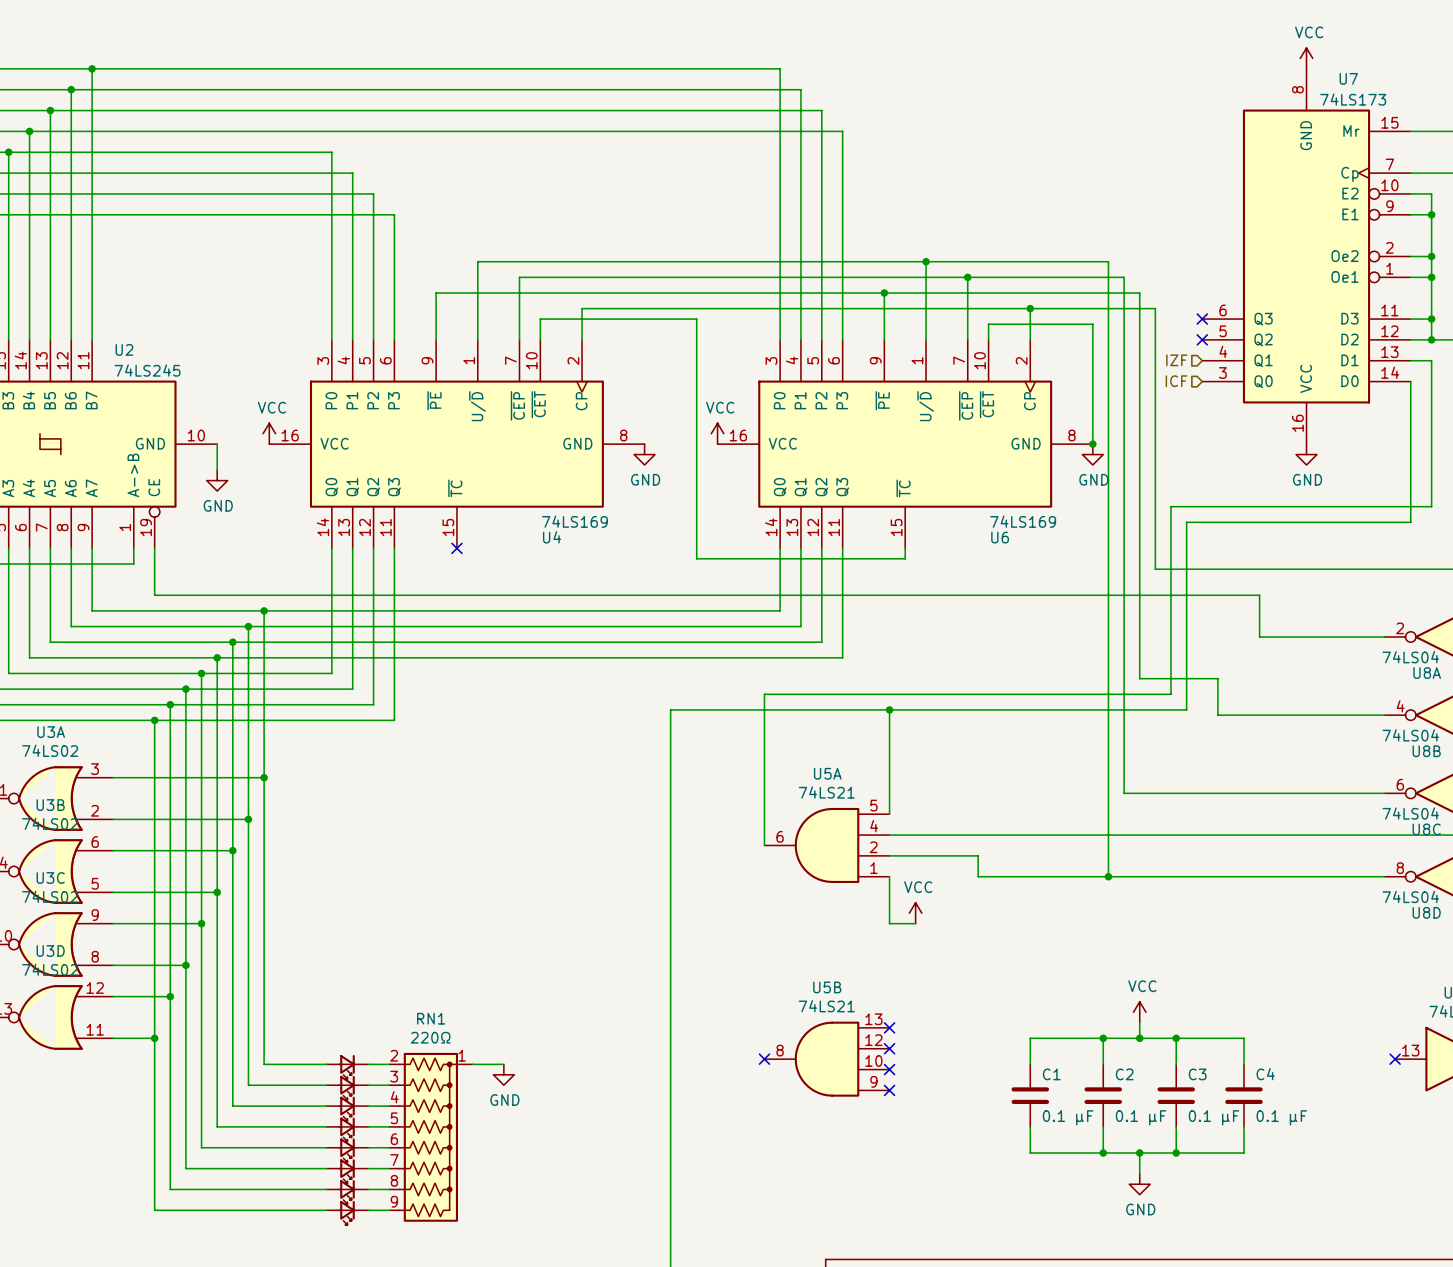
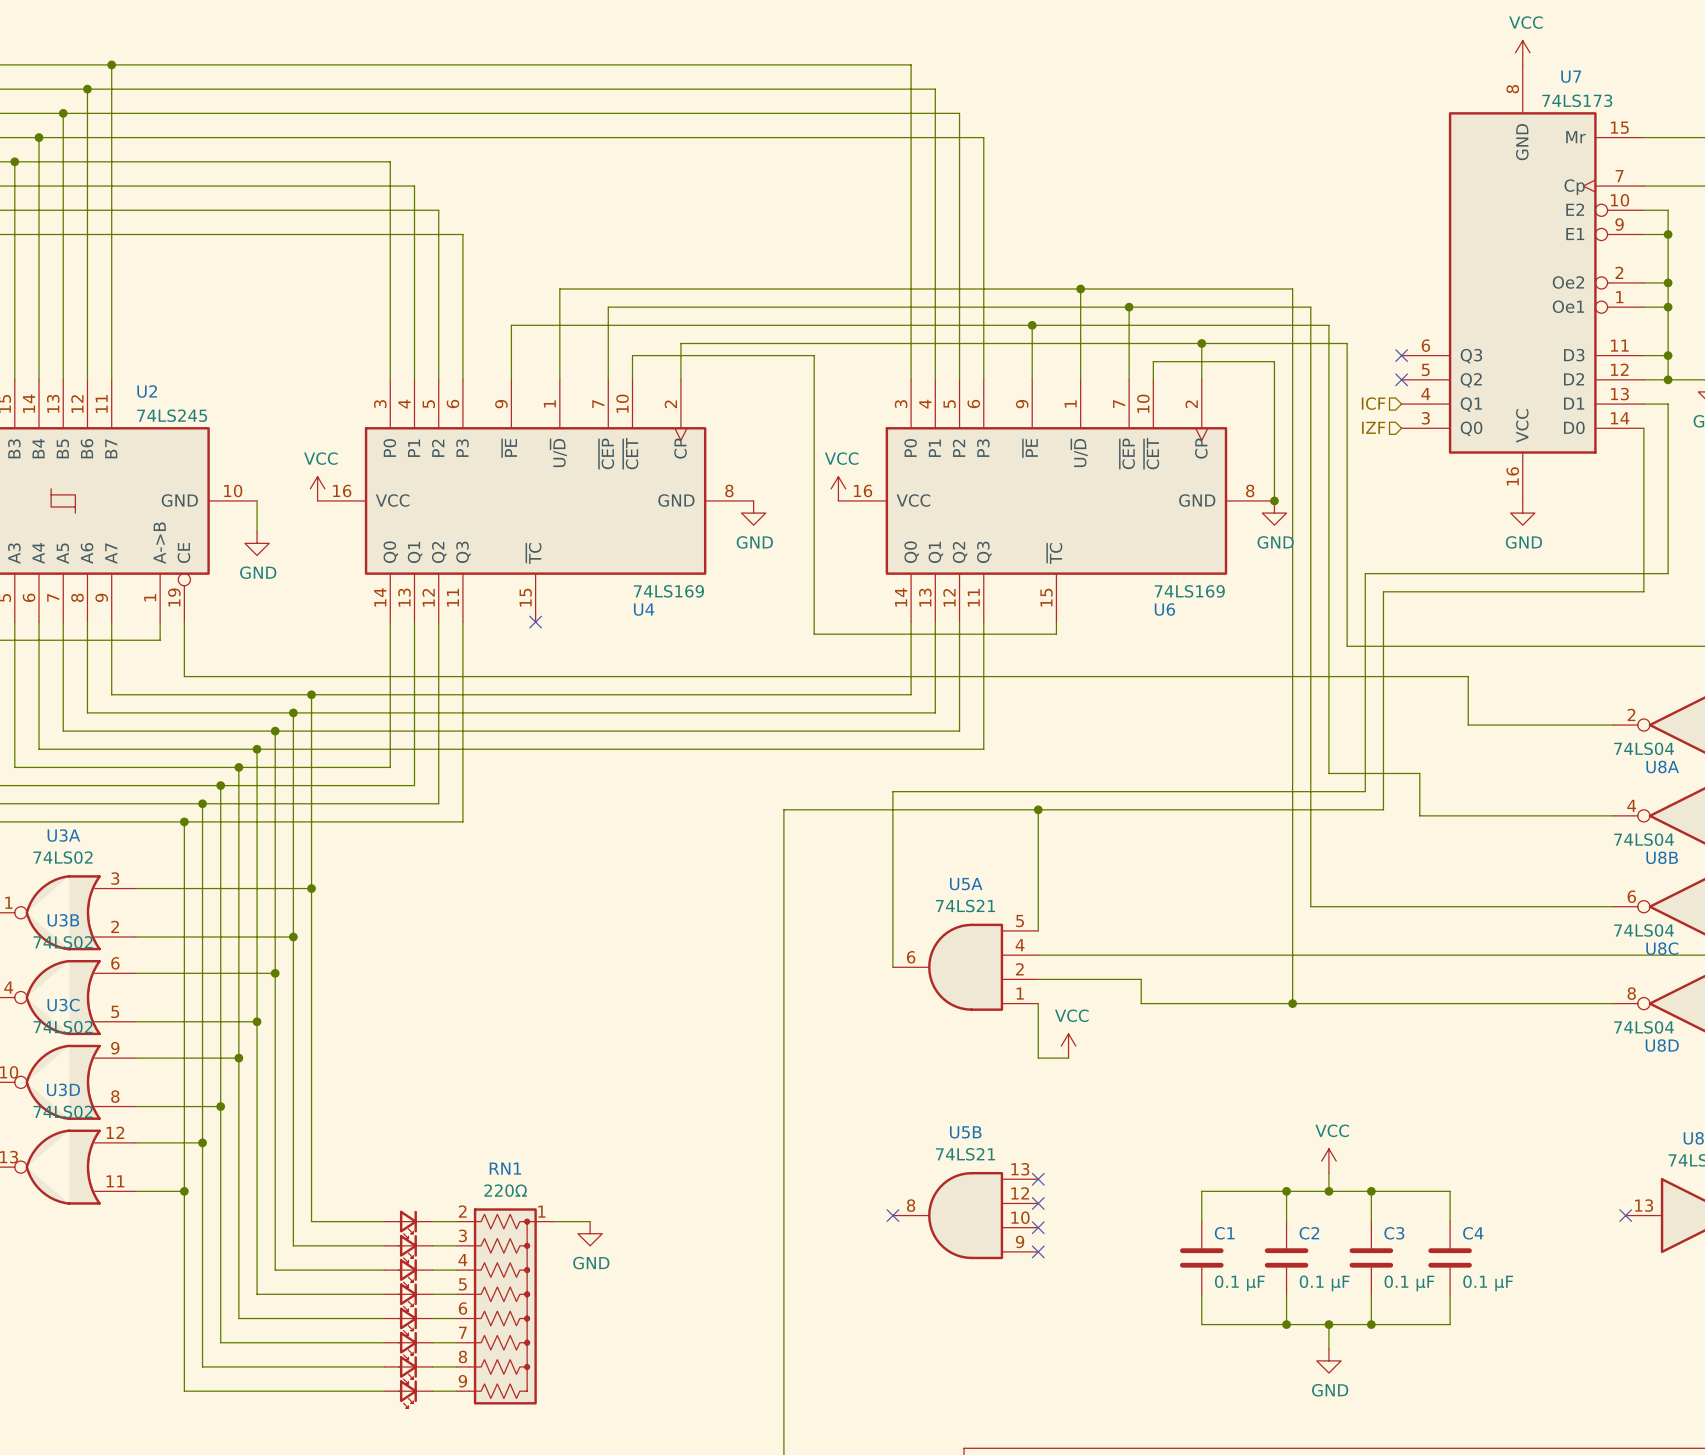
hierarchical label: IZF (1176, 360) -> ICF (1373, 403)
hierarchical label: ICF (1176, 381) -> IZF (1373, 427)

